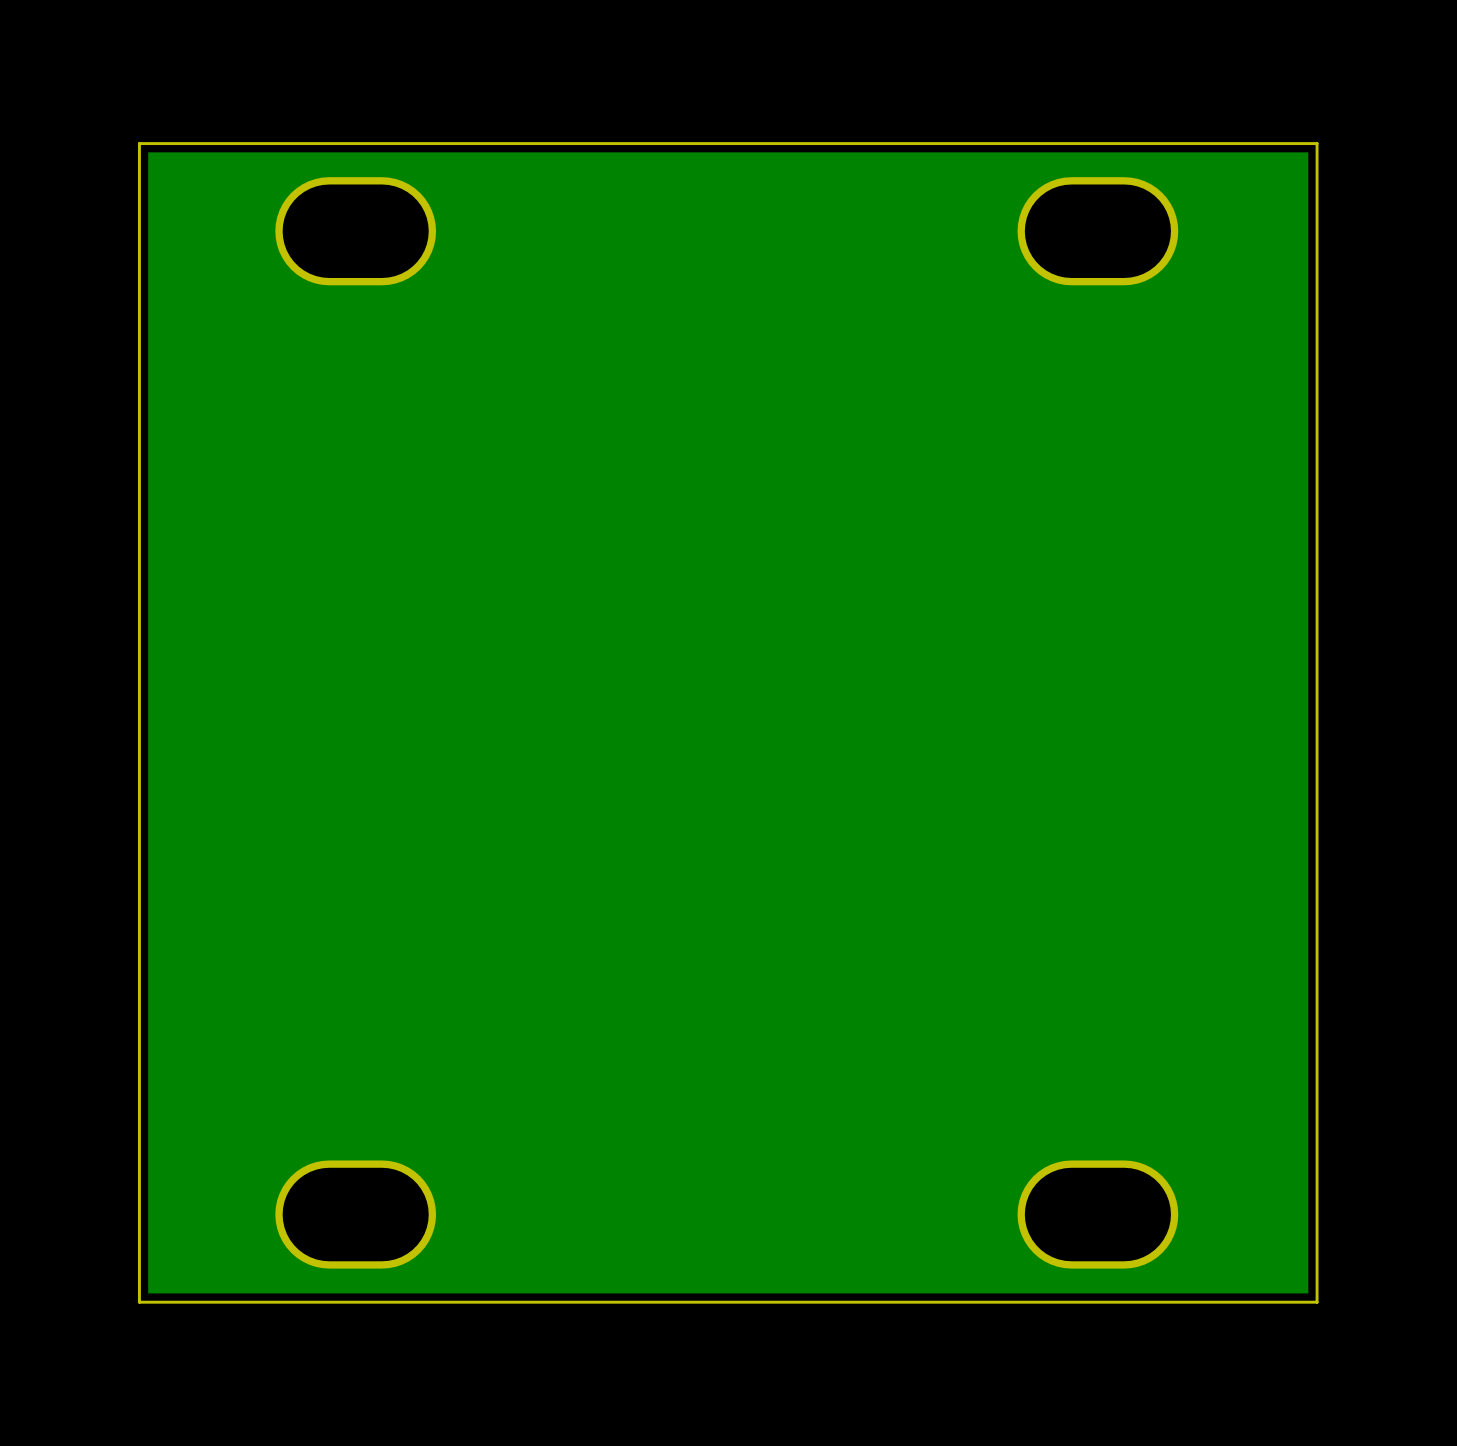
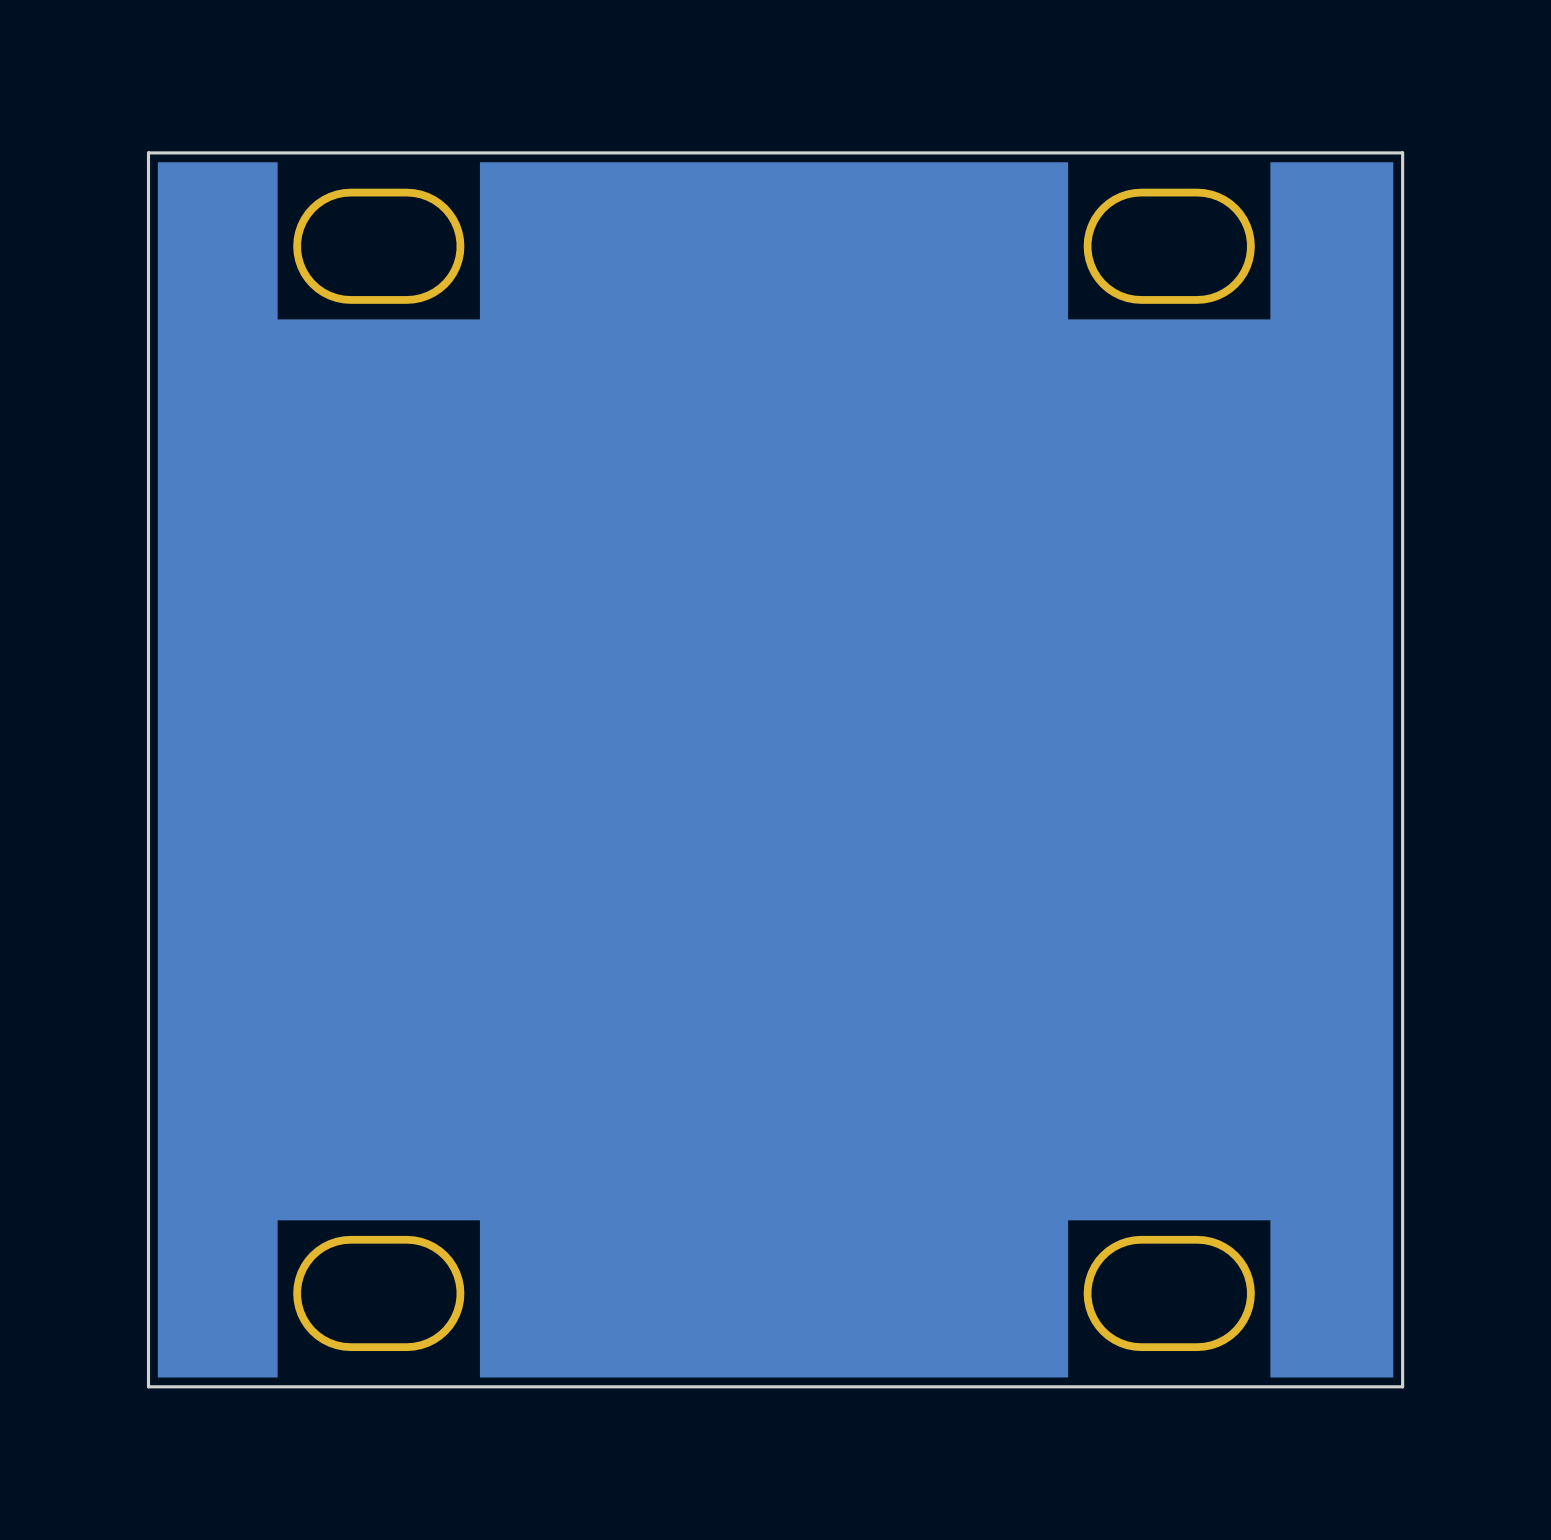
drawing shape: [148, 152, 1309, 1294] -> [277, 319, 1271, 1221]
drawing: none -> [157, 162, 278, 1378]
drawing: none -> [479, 162, 1069, 320]
drawing: none -> [1270, 162, 1394, 1378]
drawing: none -> [479, 1220, 1069, 1378]

